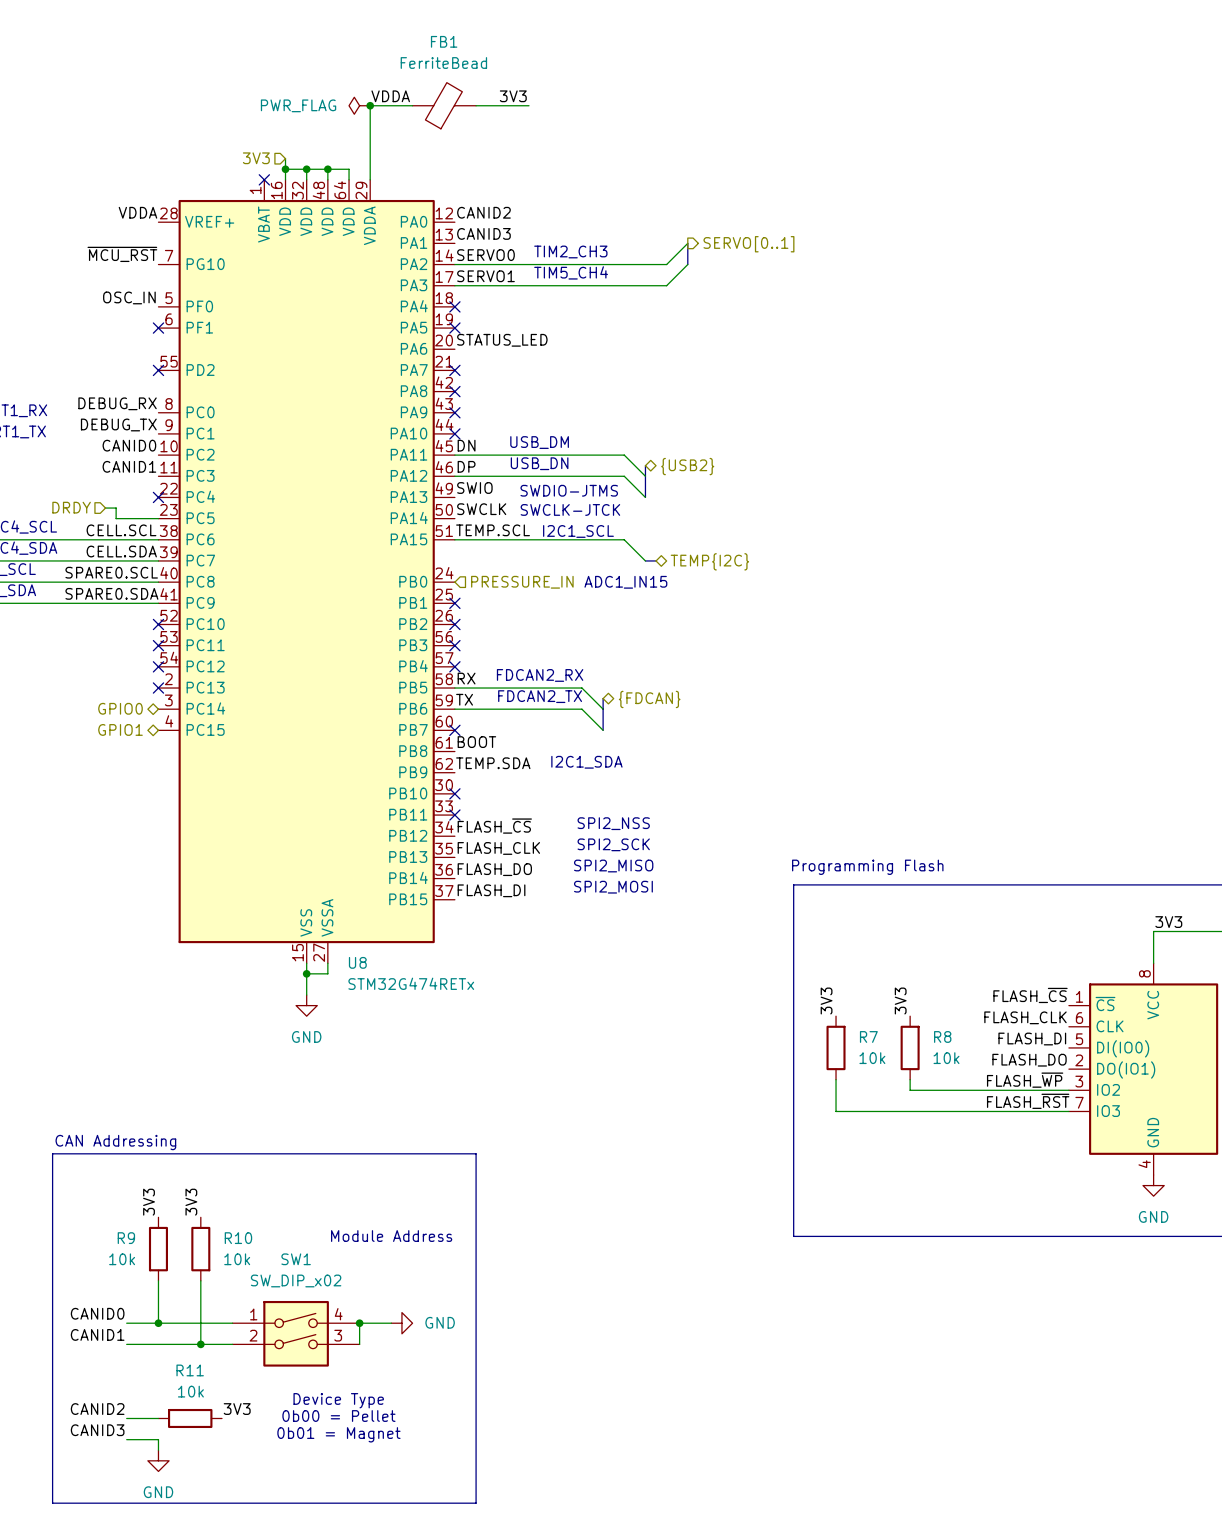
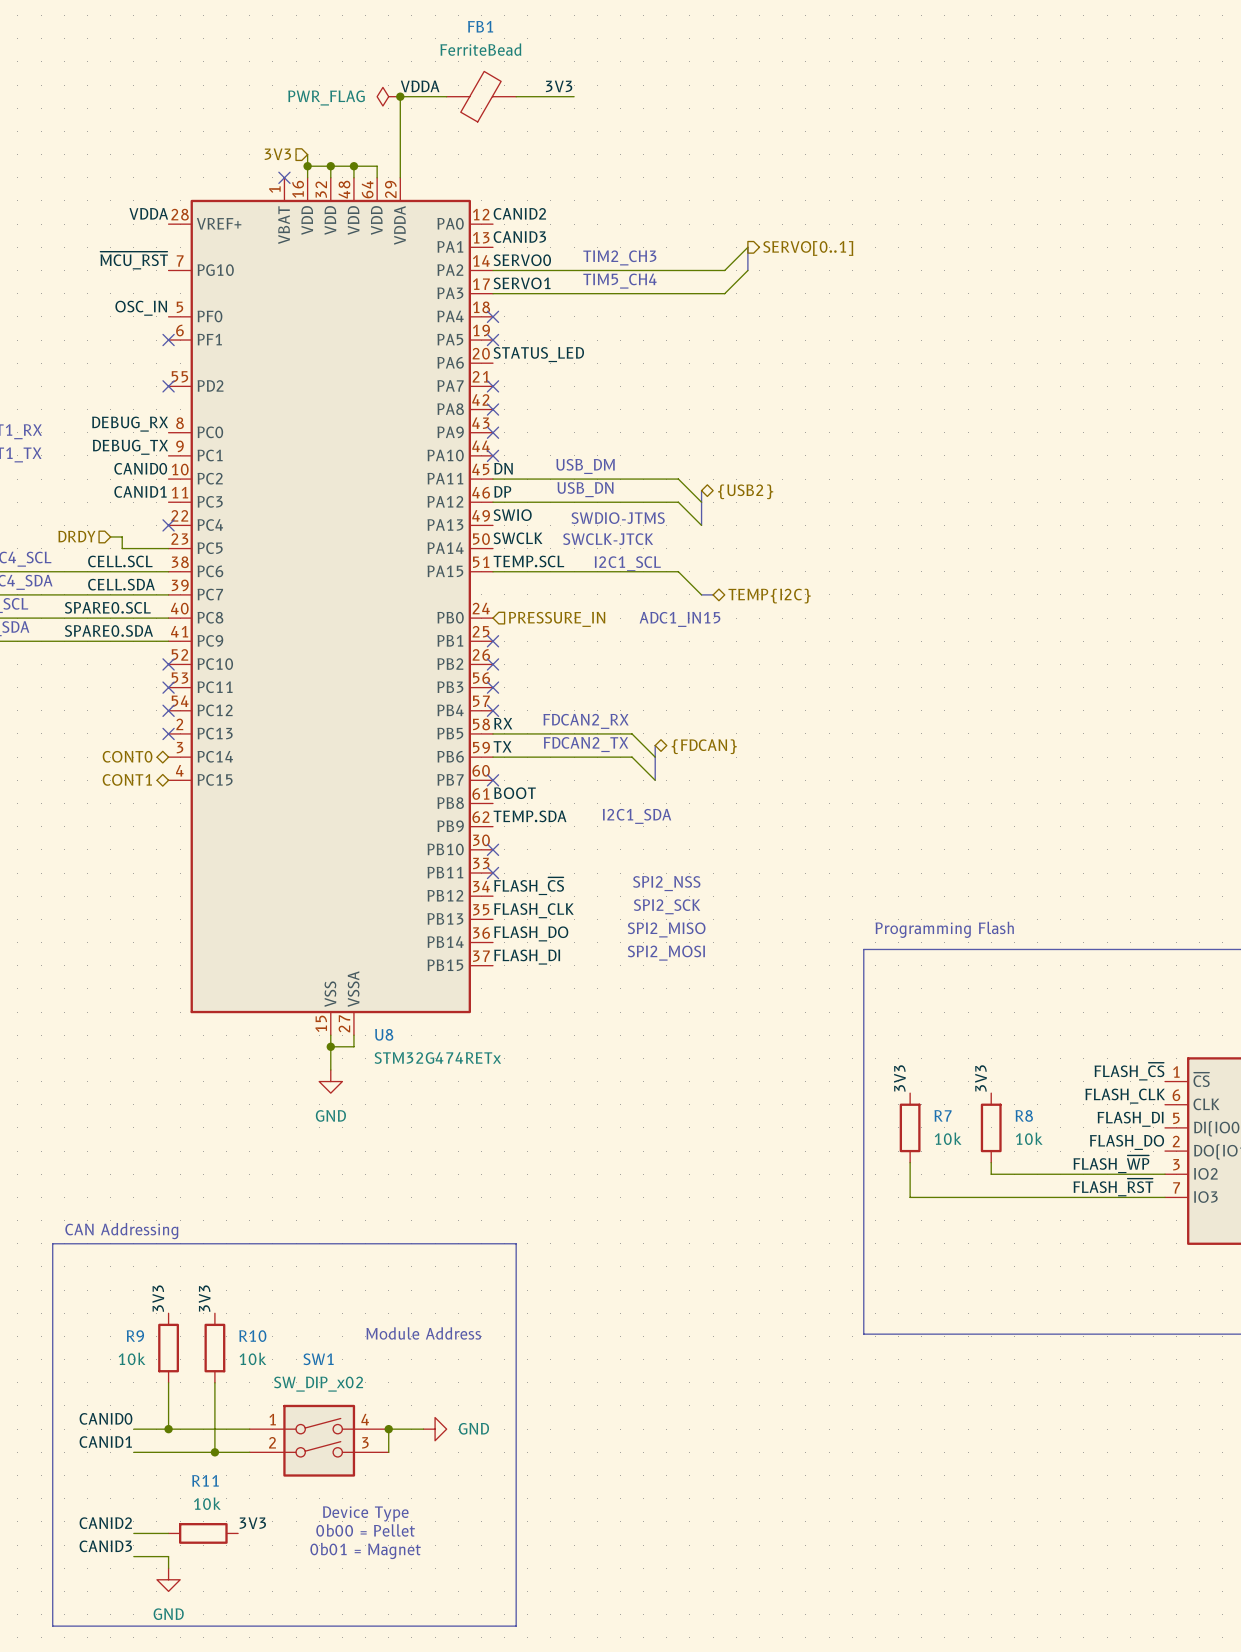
hierarchical label: GPIO0 (120, 708) -> CONT0 (127, 756)
hierarchical label: GPIO1 (120, 729) -> CONT1 (127, 779)

